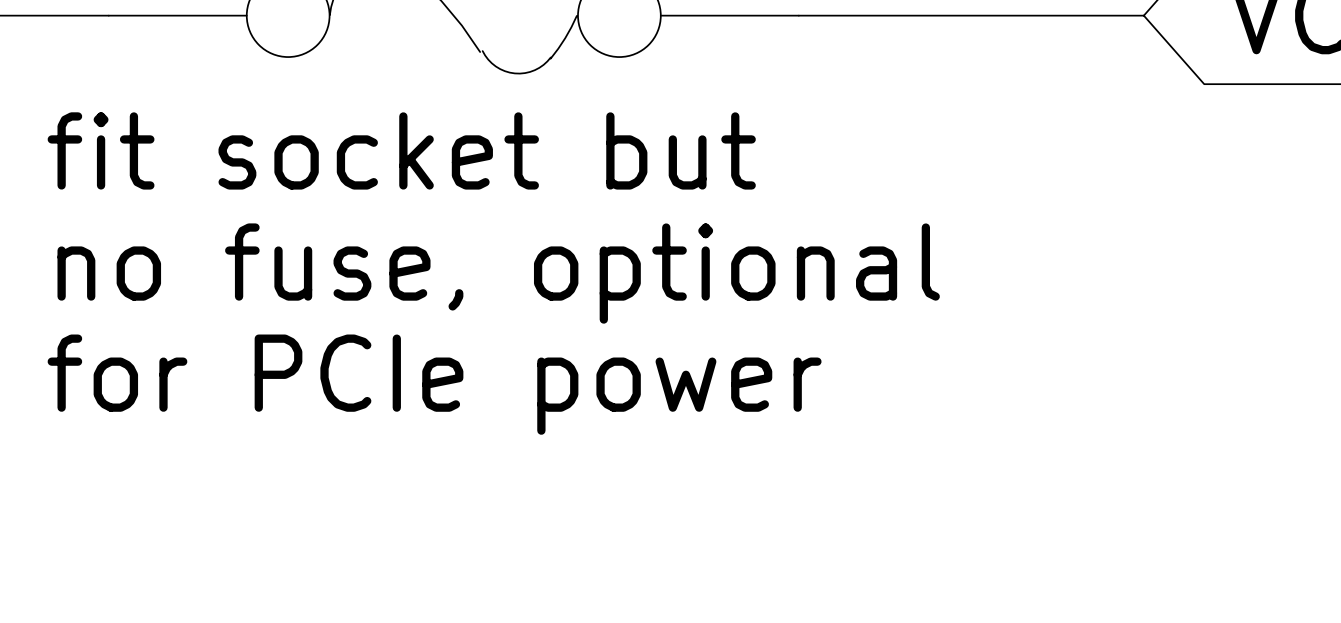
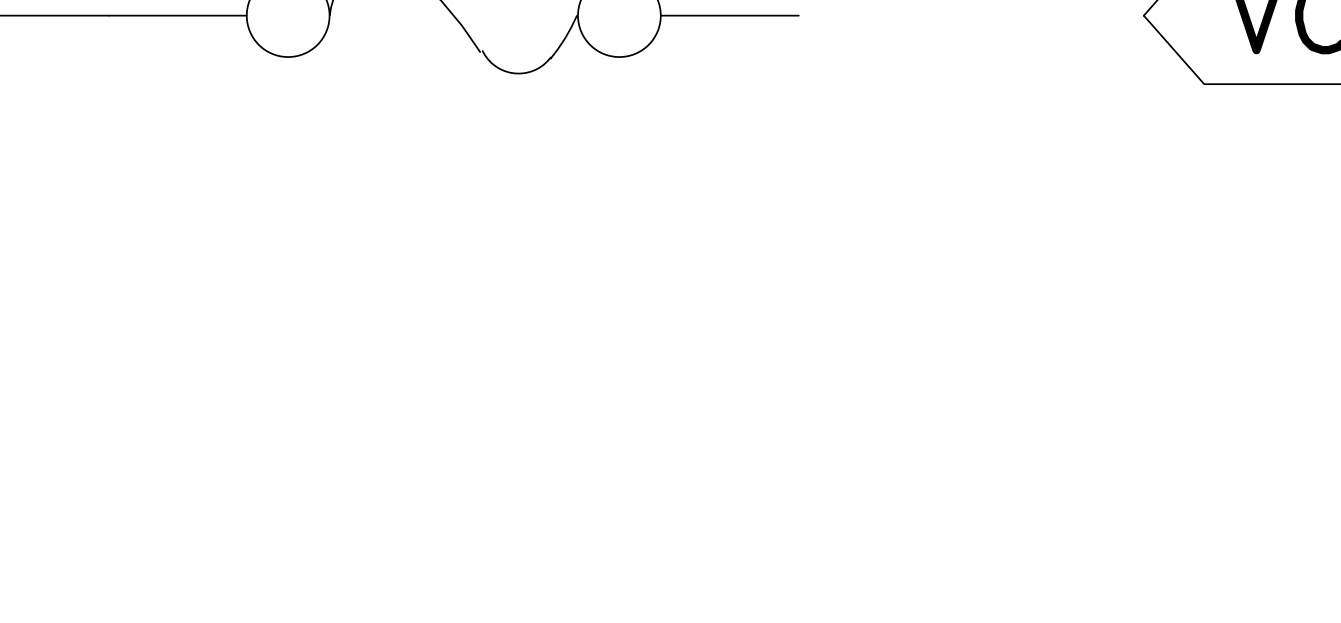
wire: (798, 15) (1143, 15) -> none
text: fit socket but (401, 150) -> none
text: no fuse, optional (498, 273) -> none
text: for PCIe power (434, 384) -> none

